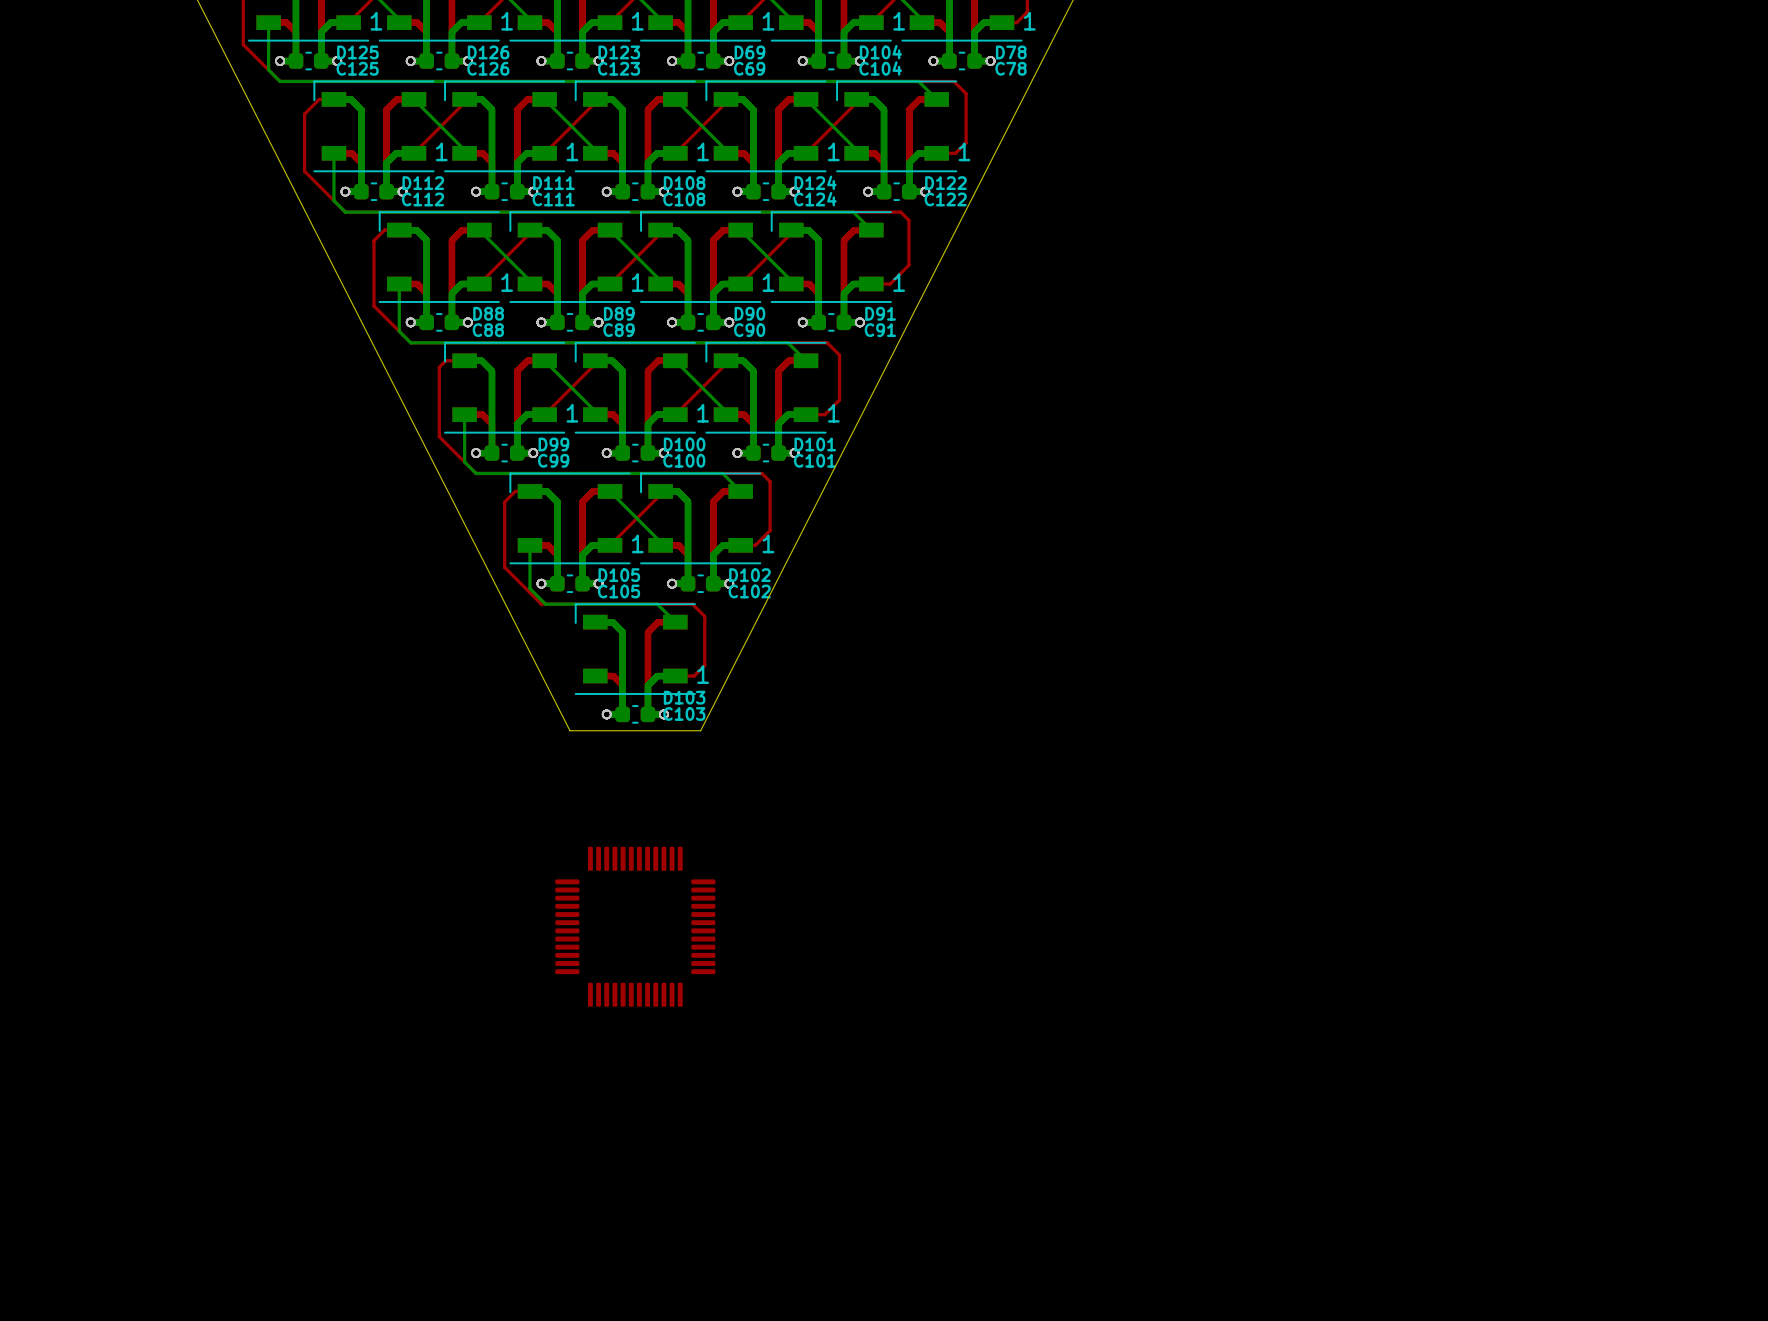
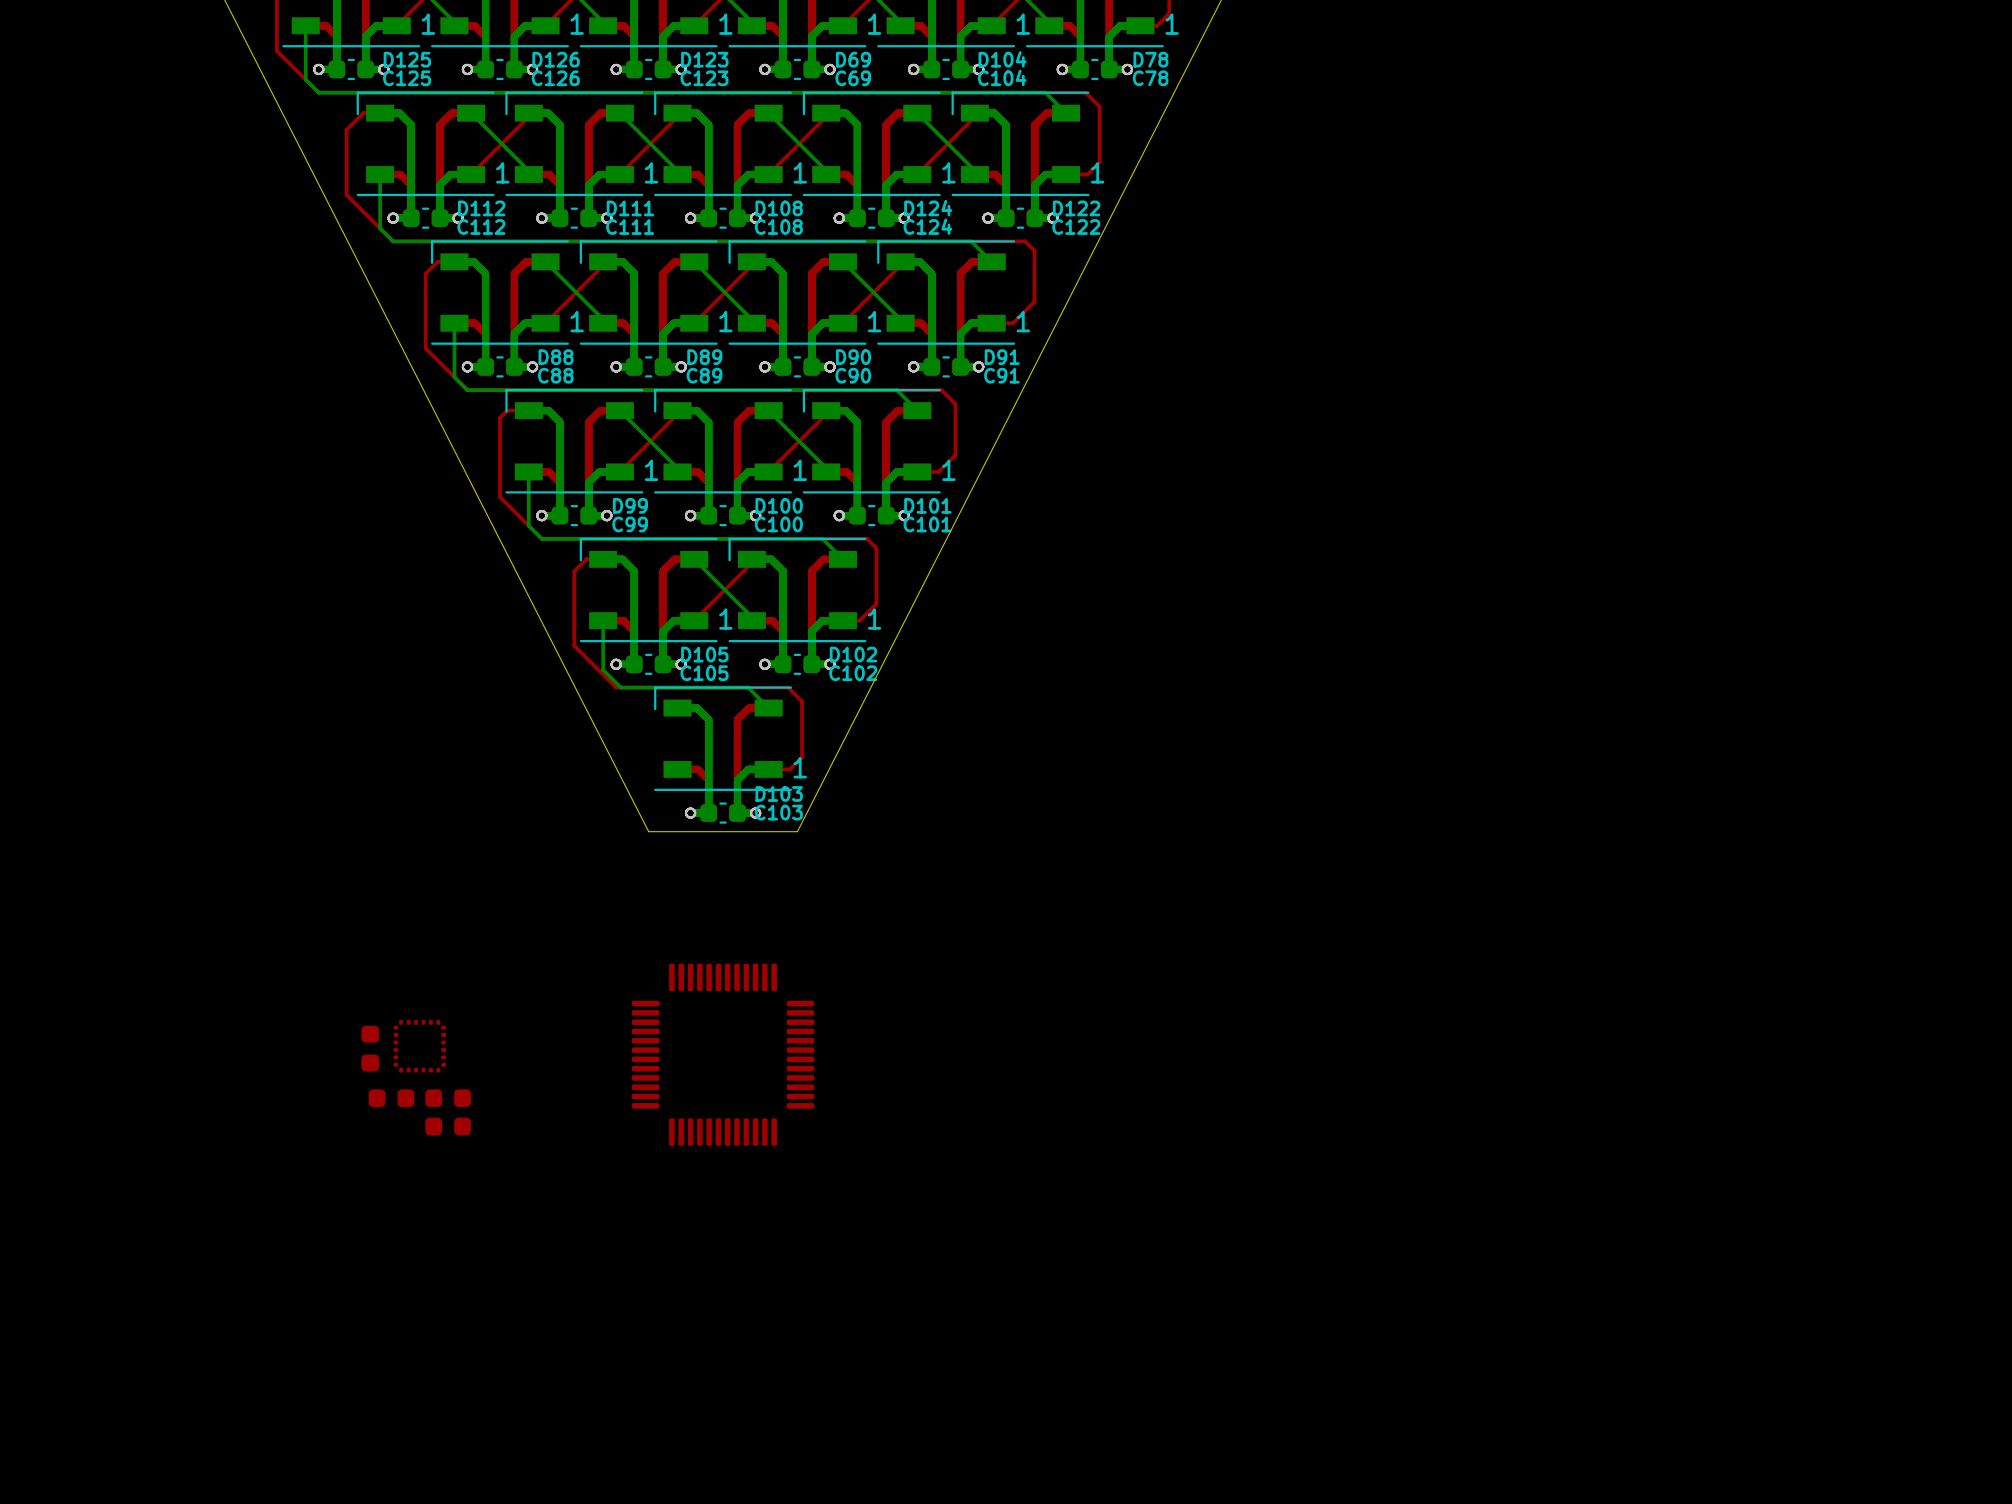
part: none -> (419, 1046)
part: none -> (370, 1048)
part: none -> (391, 1098)
part: none -> (448, 1098)
part: none -> (448, 1126)

